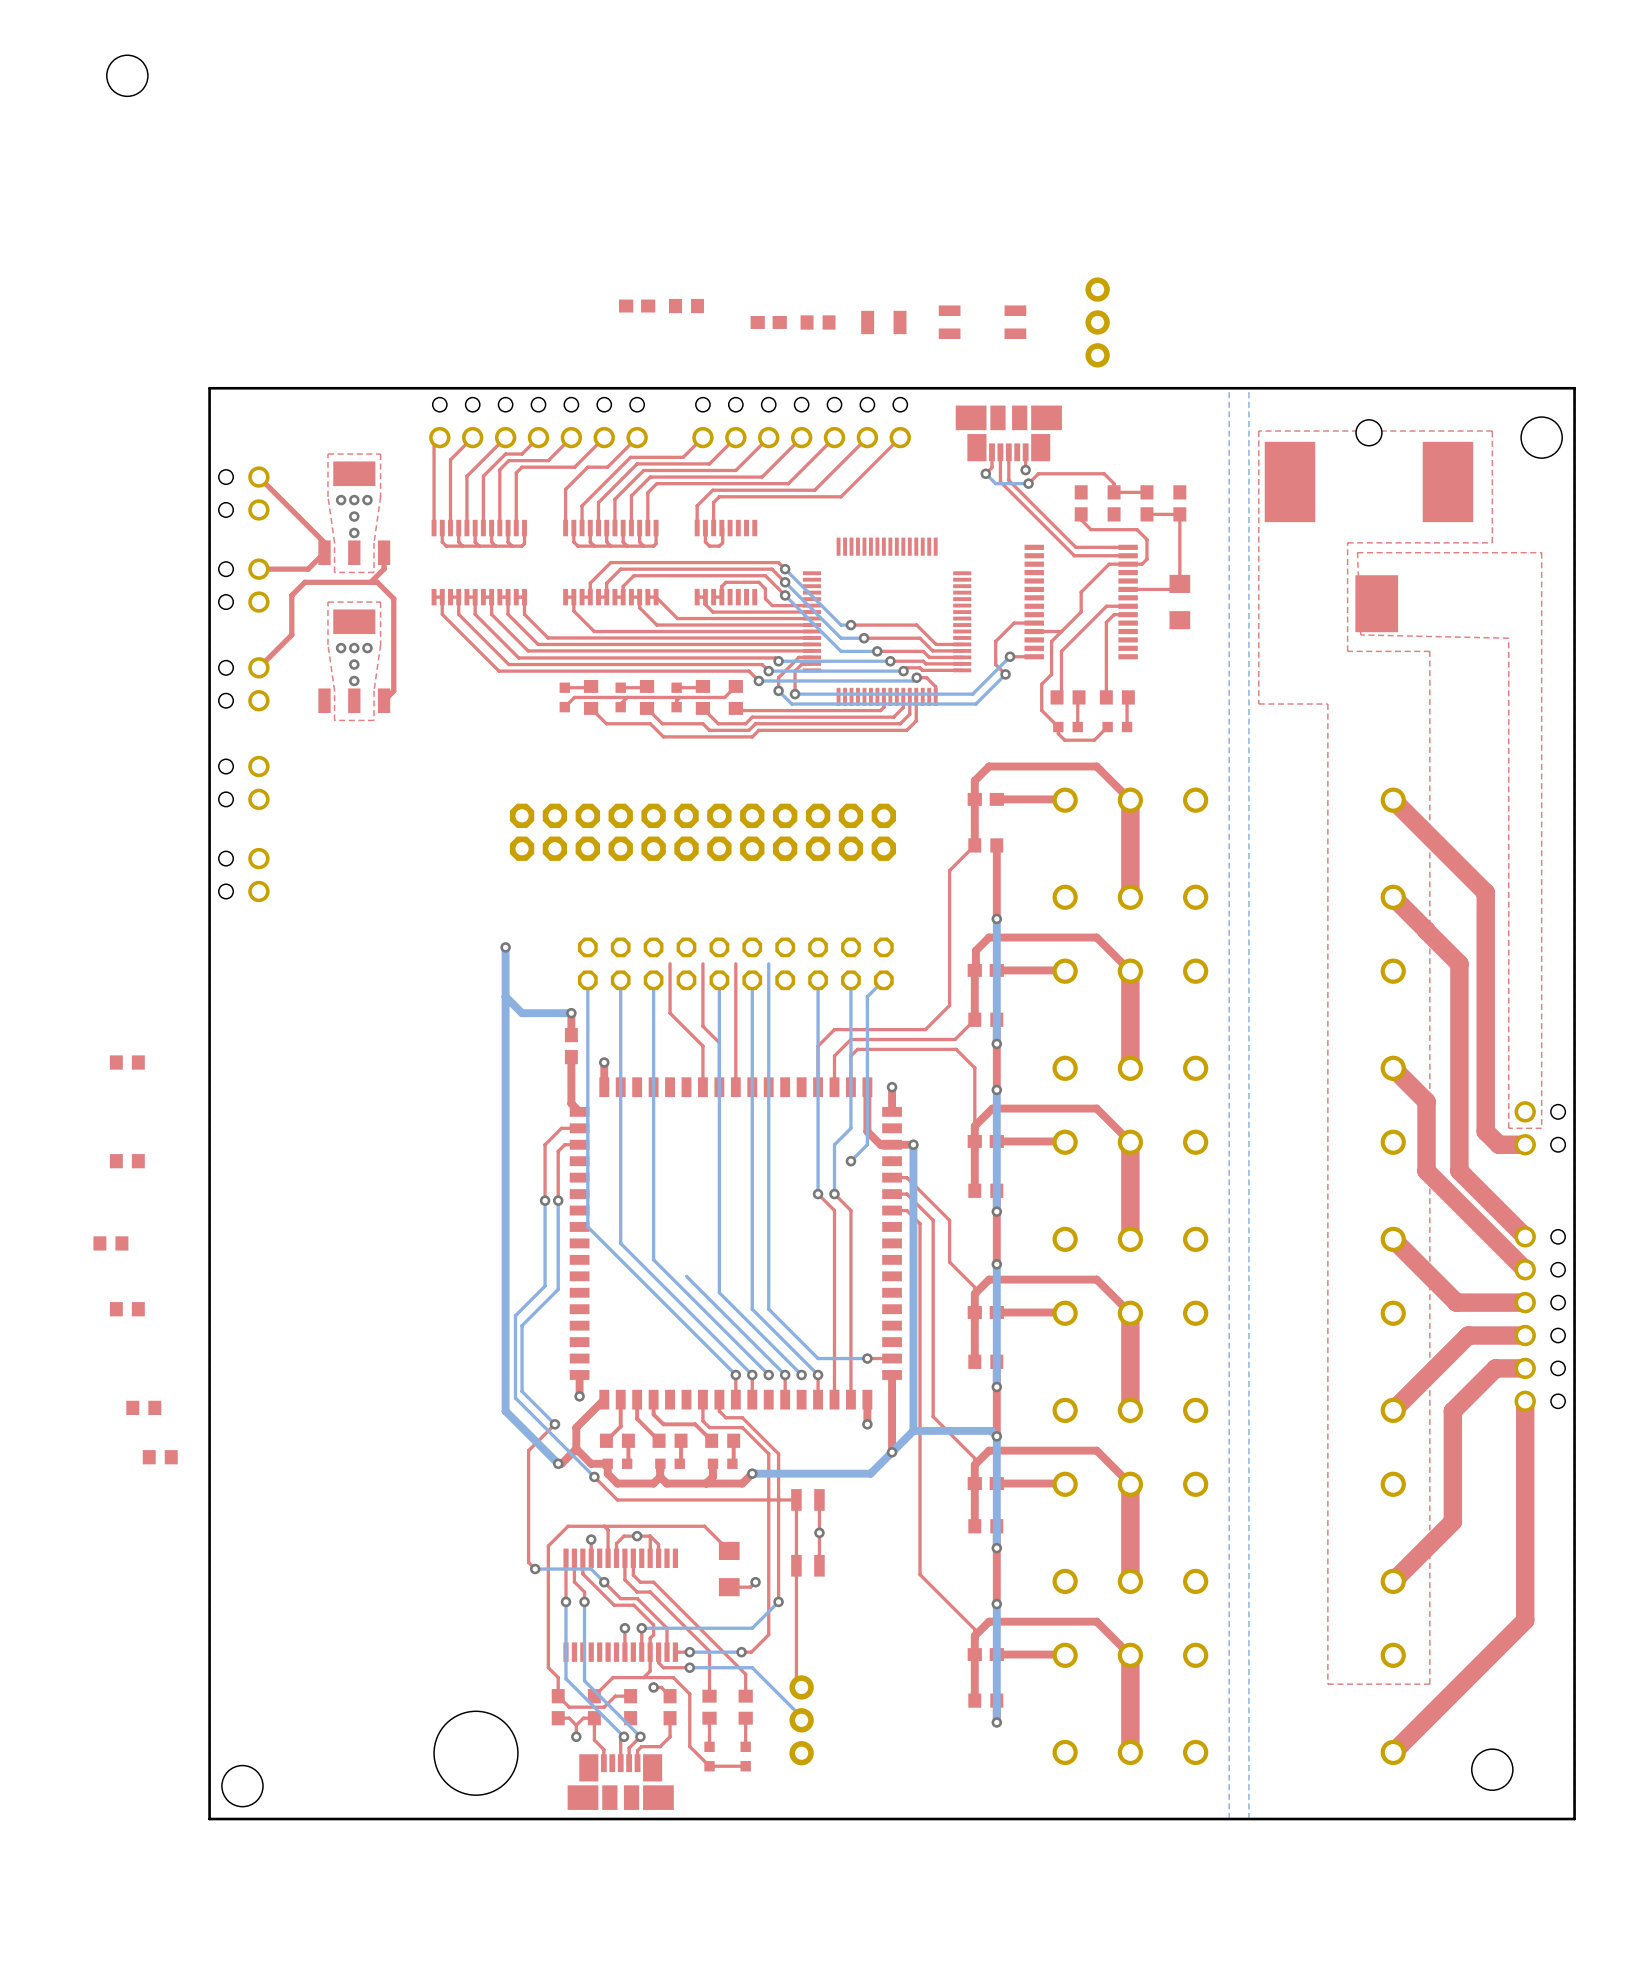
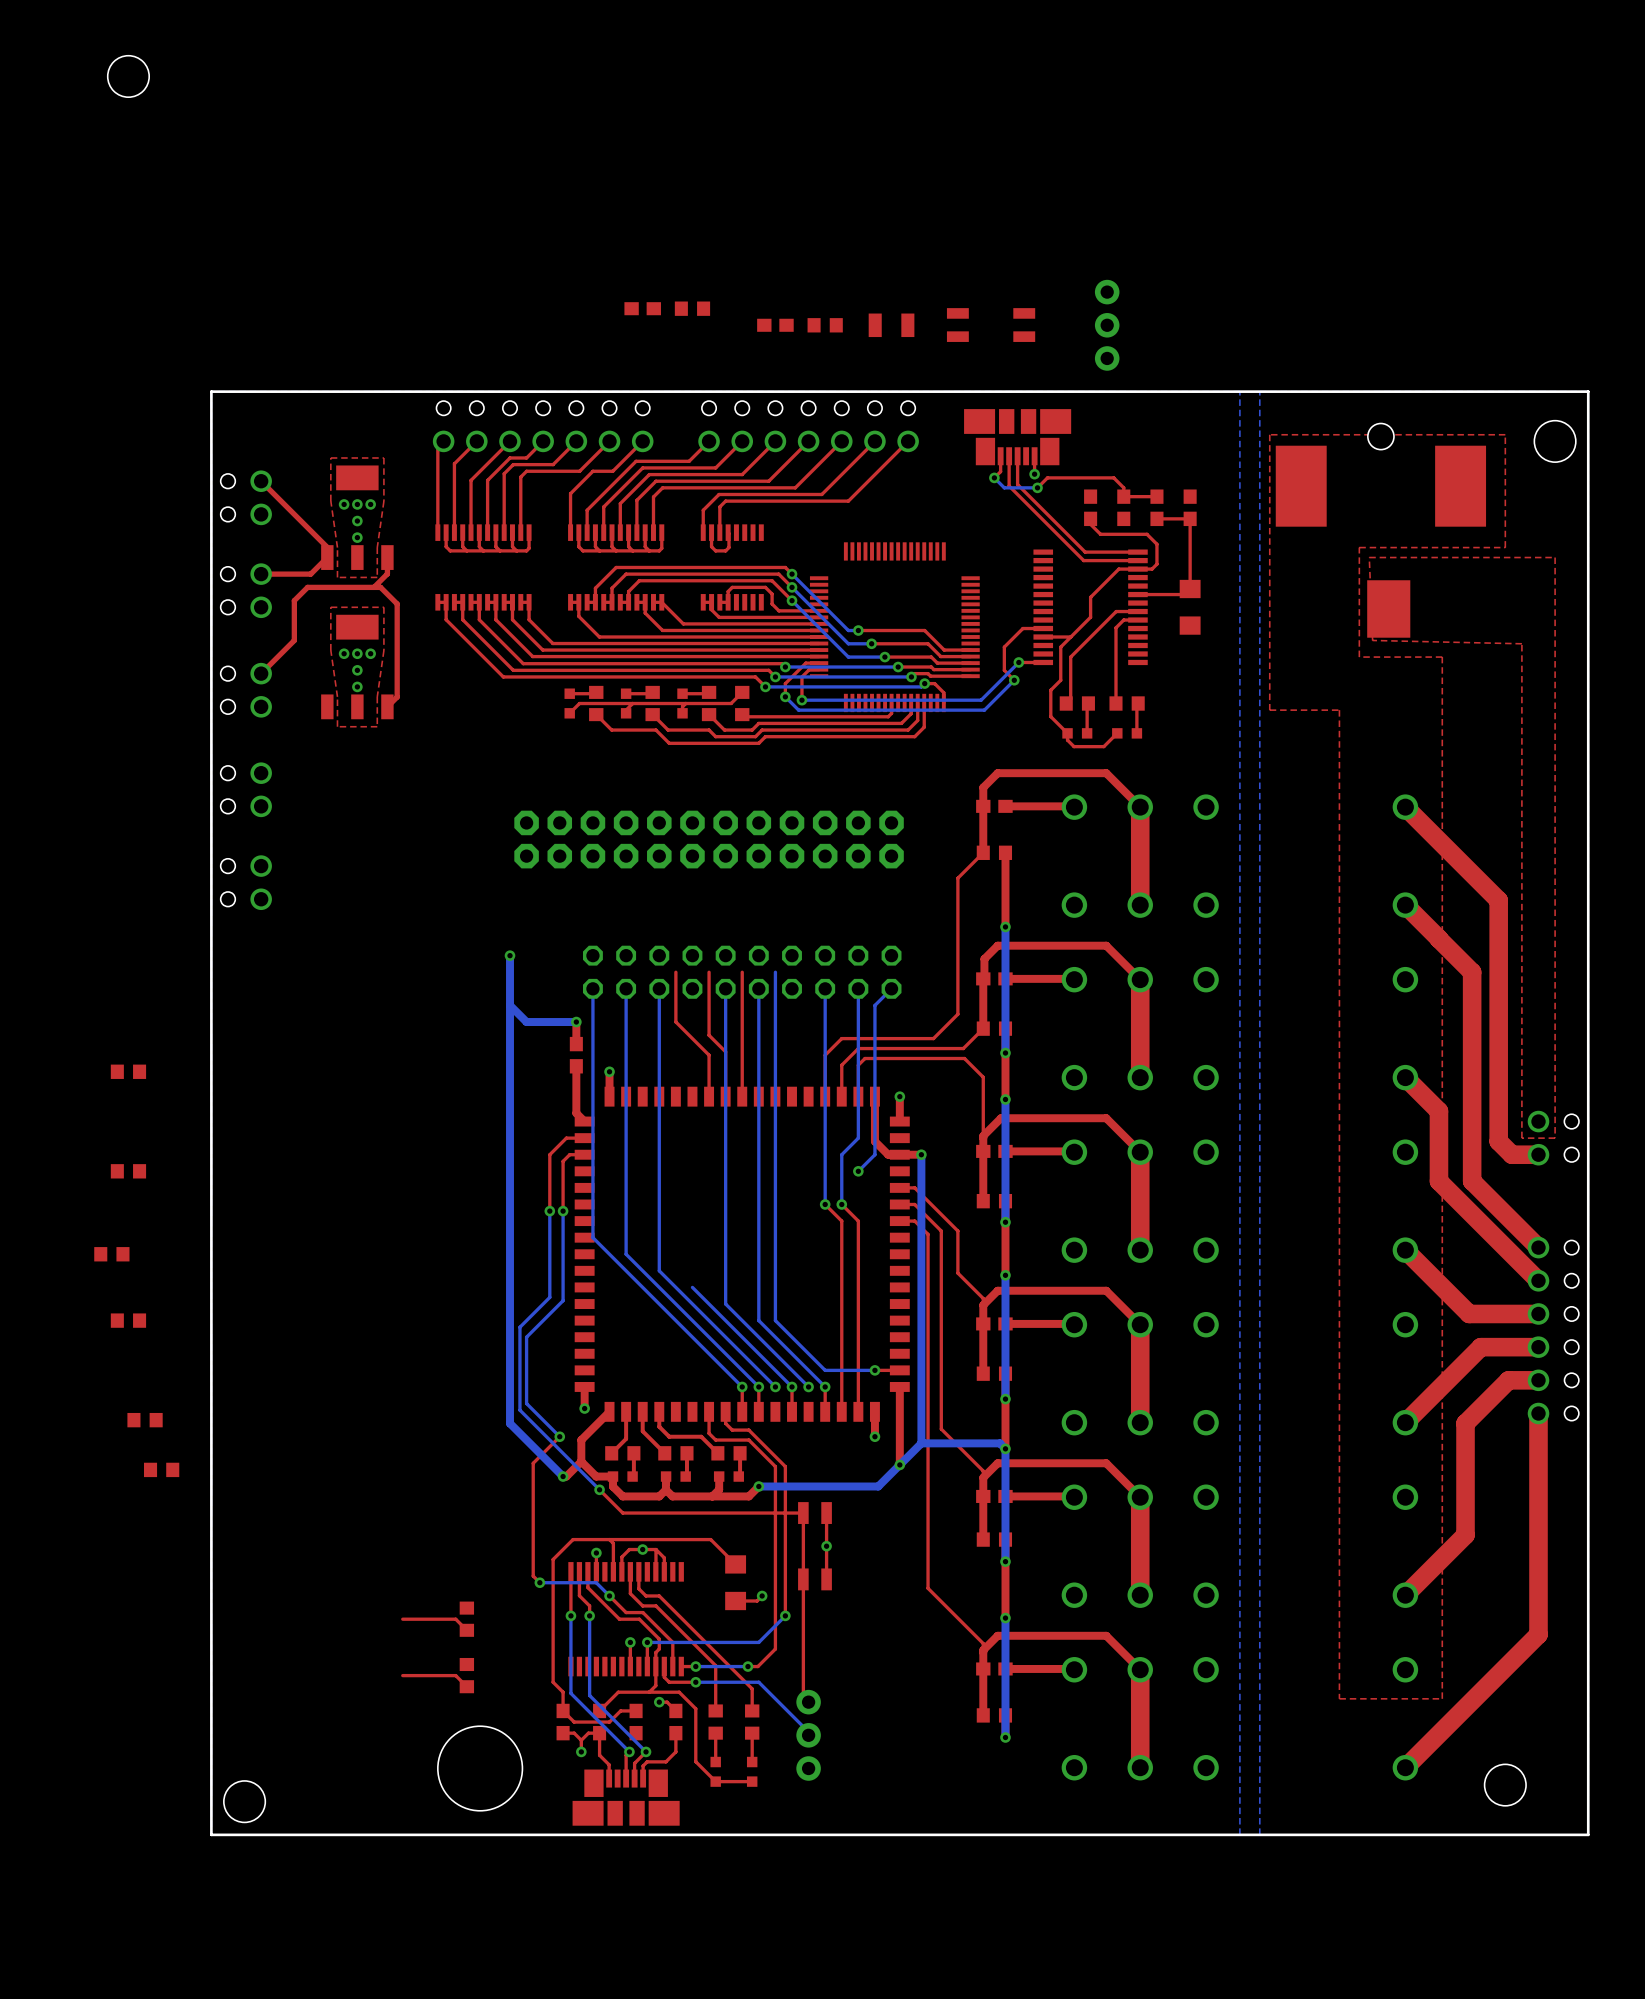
top track: none -> (402, 1619) (455, 1619) (466, 1630)
part: none -> (466, 1619)
top track: none -> (402, 1675) (455, 1675) (466, 1686)
part: none -> (466, 1675)

